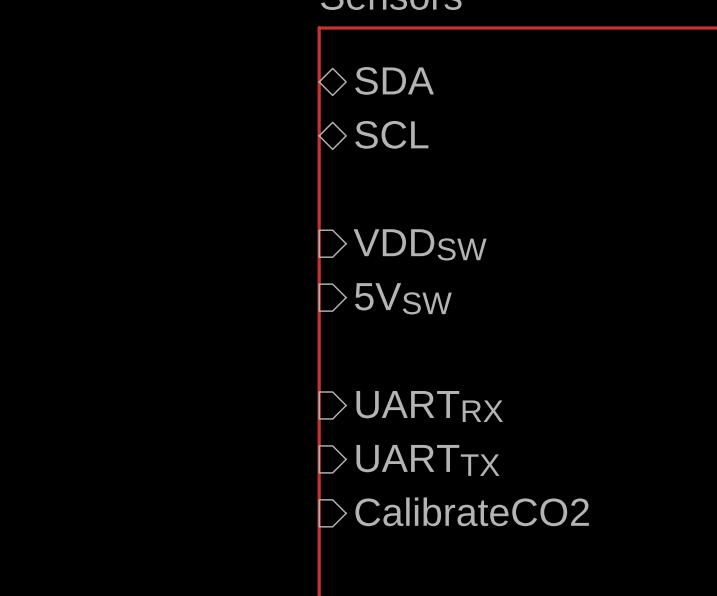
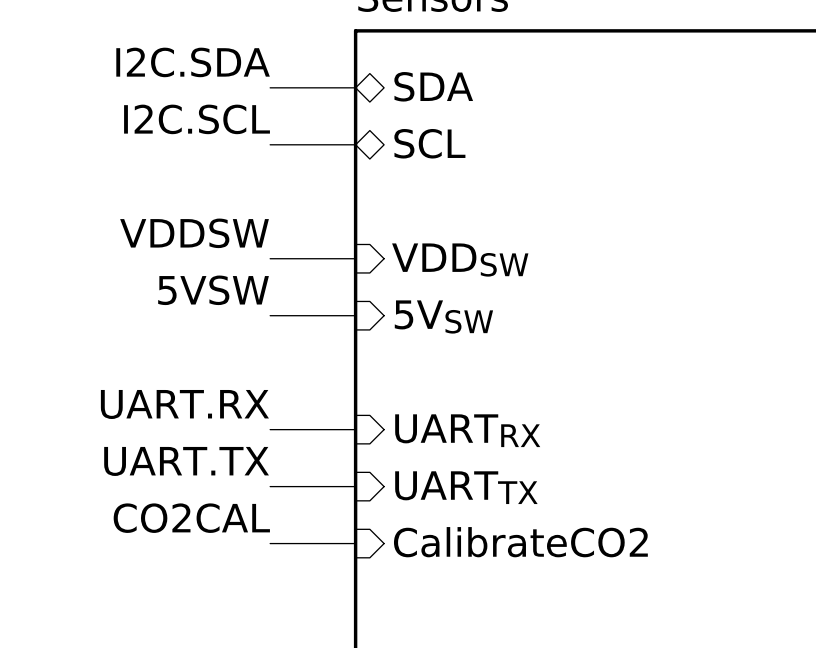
label: none -> I2C.SDA (193, 62)
wire: none -> (270, 87) (355, 87)
label: none -> I2C.SCL (197, 119)
wire: none -> (270, 144) (355, 144)
label: none -> VDDSW (194, 233)
wire: none -> (270, 258) (355, 258)
label: none -> 5VSW (213, 290)
wire: none -> (270, 315) (355, 315)
label: none -> UART.RX (184, 404)
wire: none -> (270, 429) (355, 429)
label: none -> UART.TX (186, 461)
wire: none -> (270, 486) (355, 486)
label: none -> CO2CAL (191, 518)
wire: none -> (270, 543) (355, 543)

